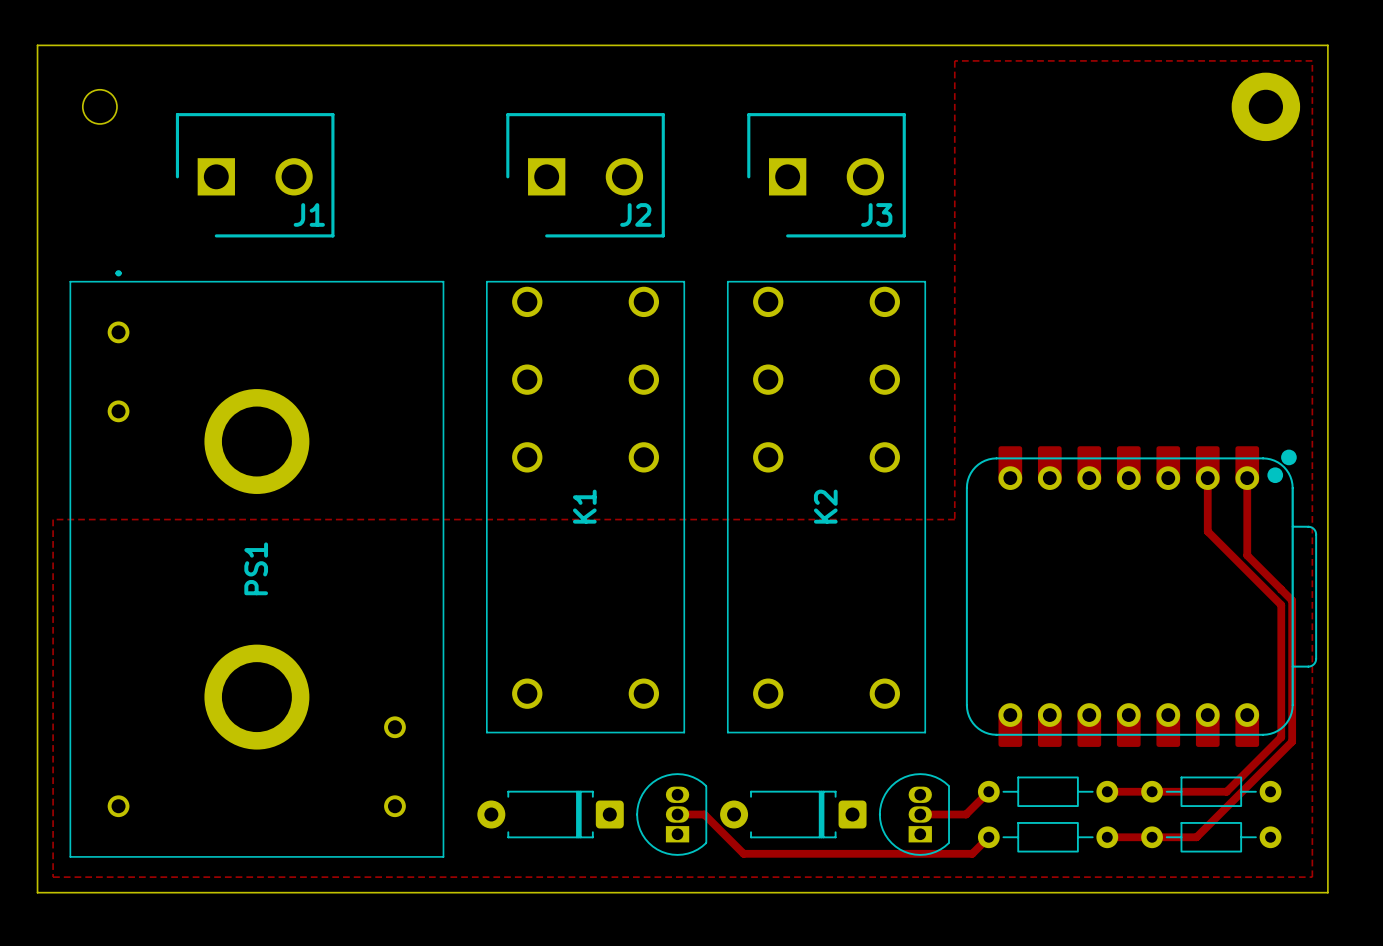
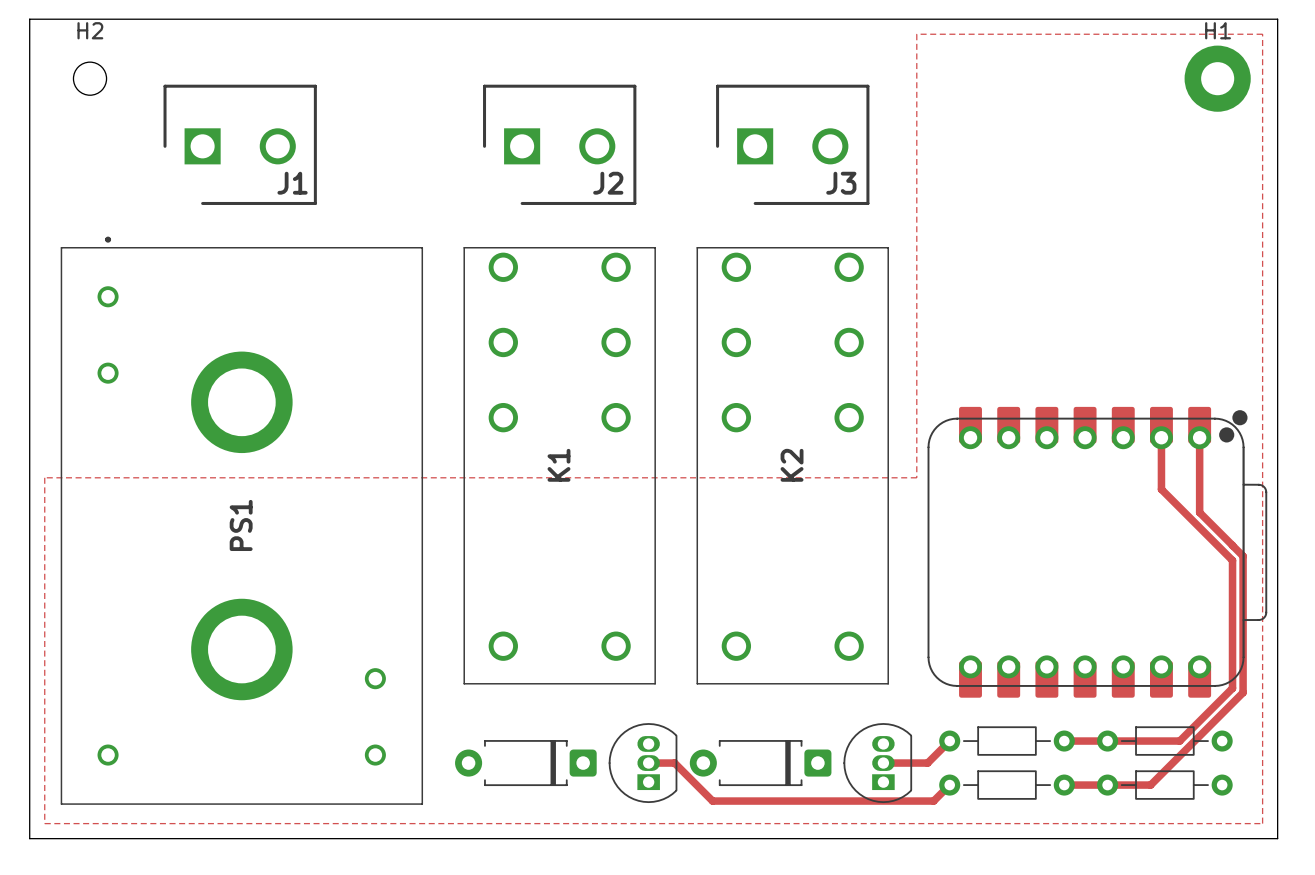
H2 name: none -> H2 (90, 30)
H1 name: none -> H1 (1218, 30)

